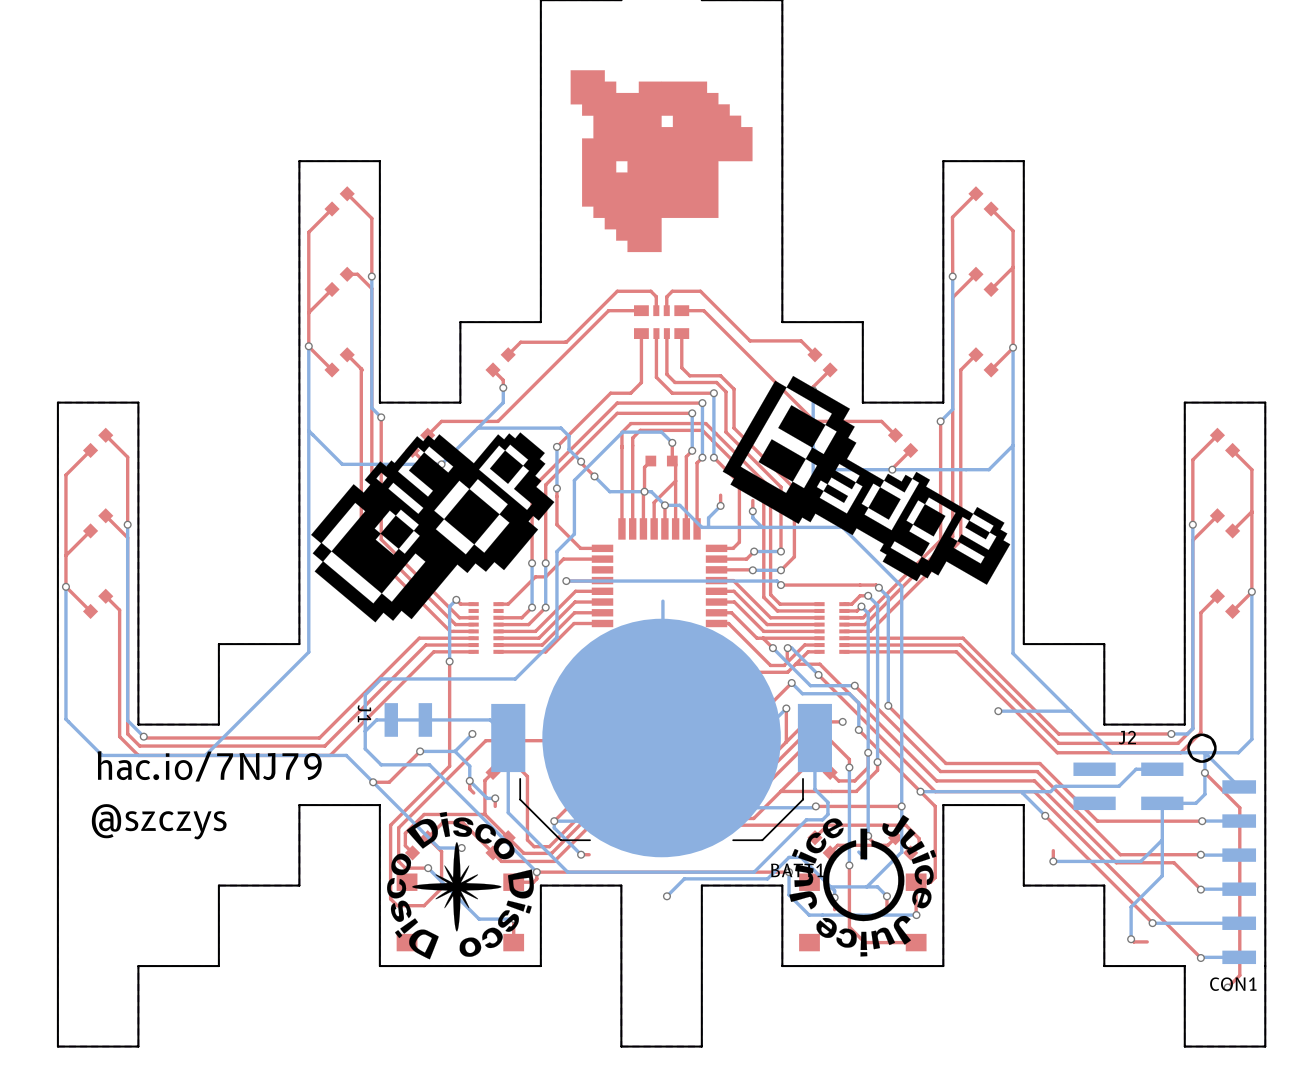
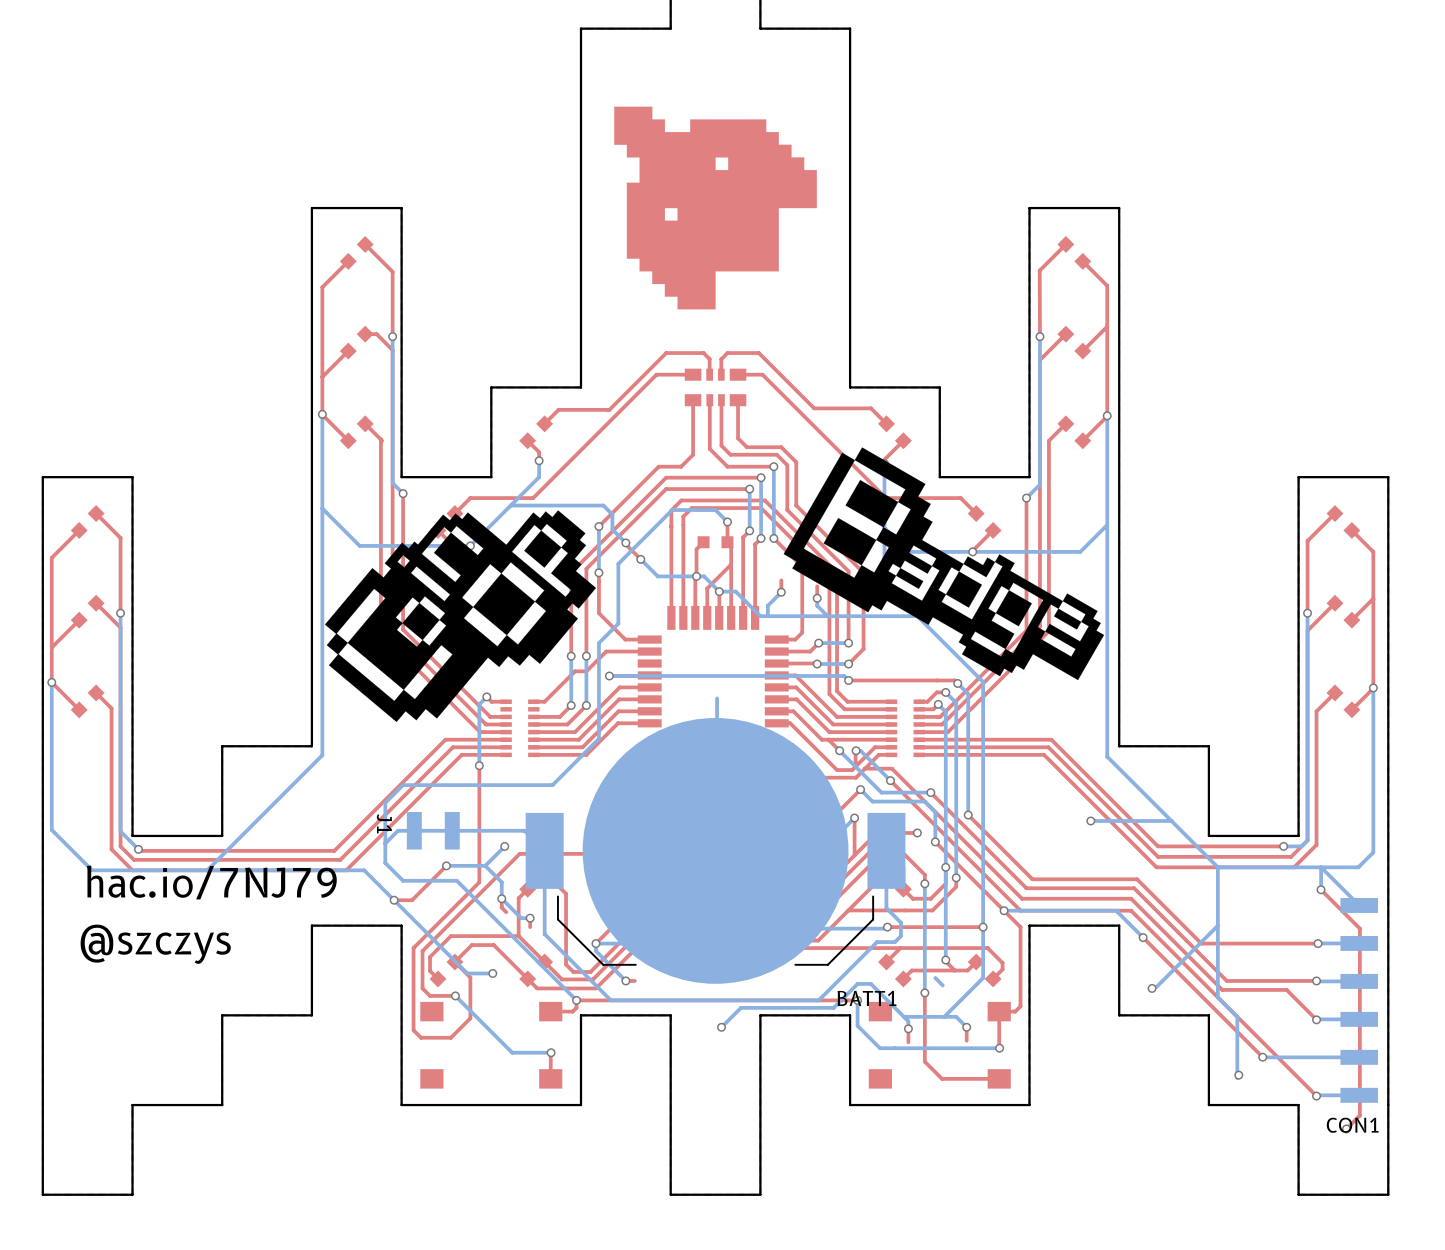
bottom track: none -> (1217, 867) (1217, 997) (1237, 1016) (1237, 1078)
bottom track: (1162, 769) (1136, 769) (1119, 786) (1056, 786) (1050, 791) (1022, 791) -> none
J2: (1145, 771) -> none
bottom track: (1204, 772) (1204, 794) (1195, 803) (1162, 803) (1162, 875) (1131, 907) (1131, 939) -> none
bottom track: none -> (1217, 925) (1156, 986)
drawing: [387, 811, 534, 960] -> none
drawing: [789, 815, 937, 957] -> none
bottom track: (1162, 839) (1140, 861) (1053, 861) -> none
top track: (1053, 850) (1053, 861) -> none
top track: (1131, 939) (1133, 941) (1147, 941) -> none

